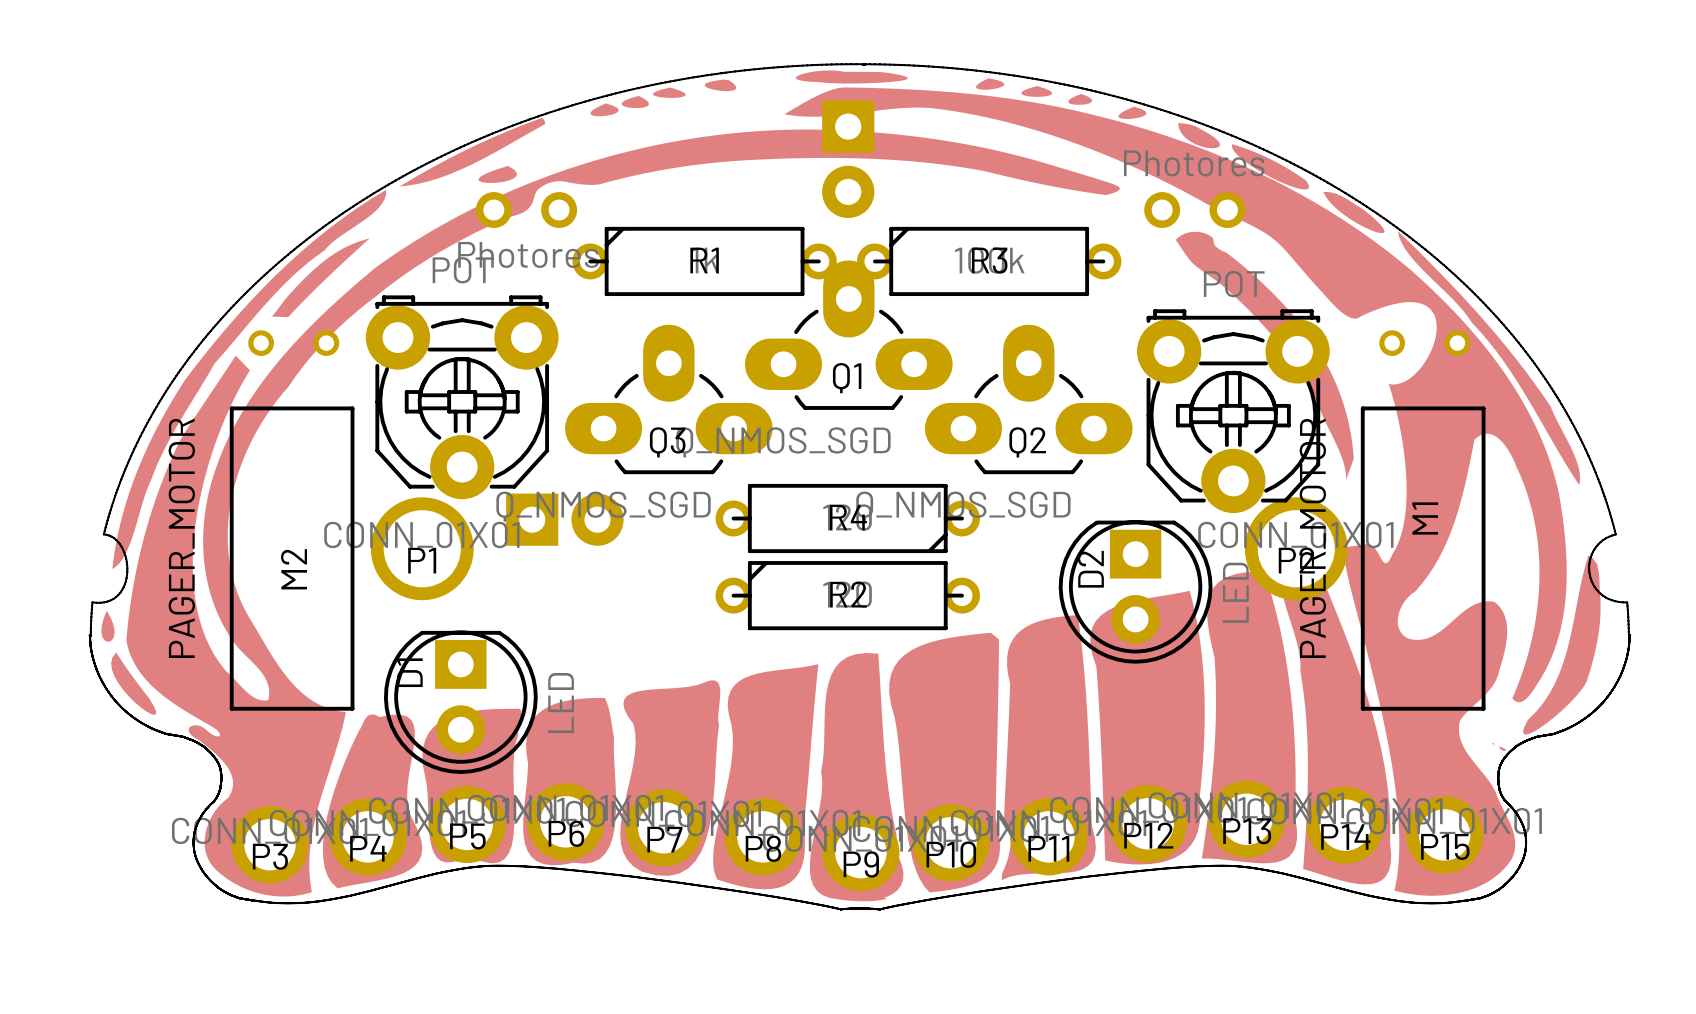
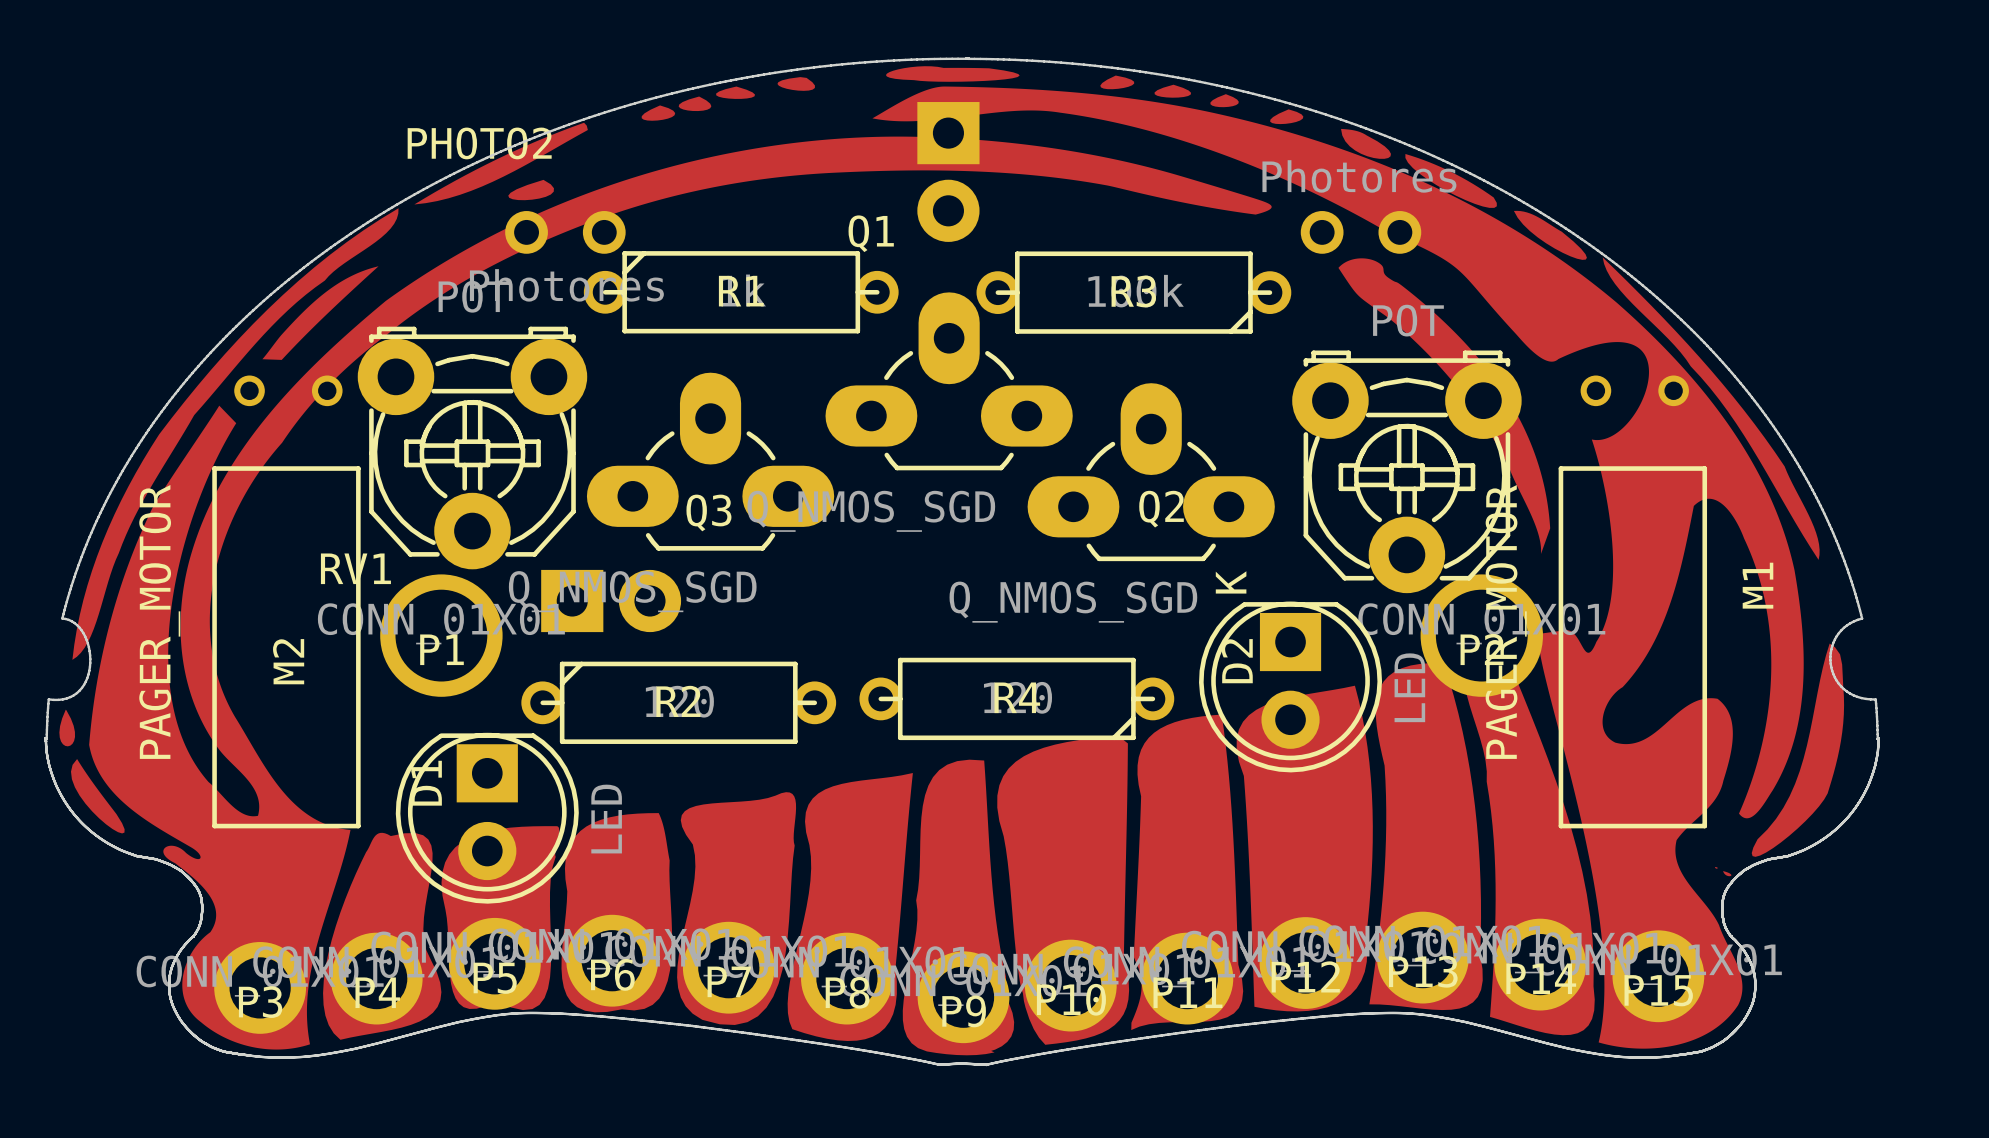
drawing shape: [88, 63, 1631, 911] -> [44, 57, 1880, 1067]
PHOTO2 name: none -> PHOTO2 (479, 143)
R1 position: (704, 261) -> (741, 292)
R3 rotation: 0° (989, 261) -> 180° (1133, 292)
Q1 name position: Q1 (847, 378) -> Q1 (871, 233)
RV1 position: (462, 397) -> (472, 447)
Q3 position: (668, 399) -> (710, 461)
Q2 position: (1028, 399) -> (1151, 472)
RV1 name: none -> RV1 (355, 568)
D2 text: none -> K (1231, 582)
R4 position: (847, 518) -> (1016, 698)
M1 name position: M1 (1425, 518) -> M1 (1757, 585)
R2 position: (847, 595) -> (678, 702)

